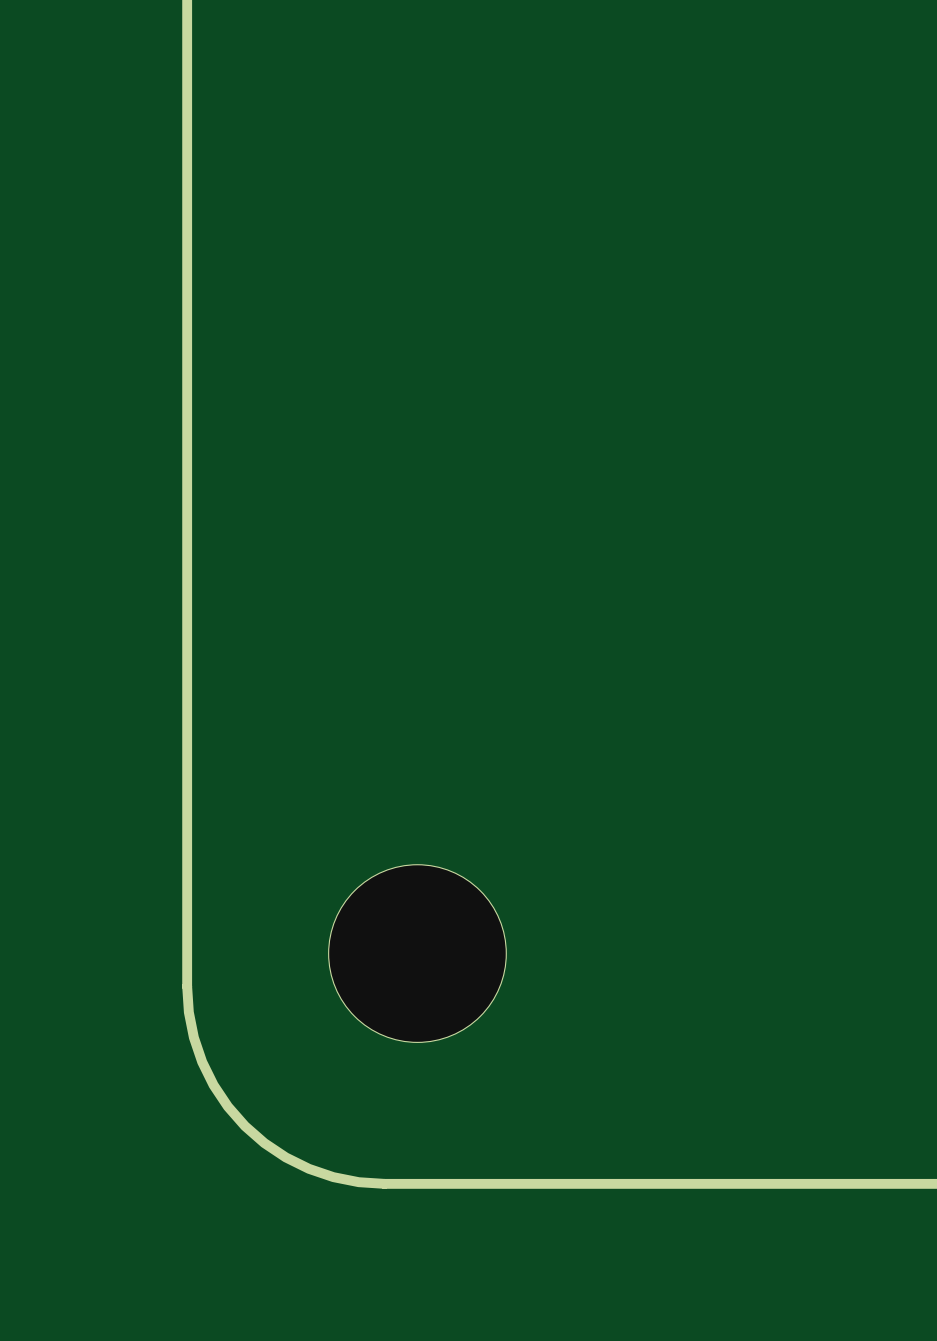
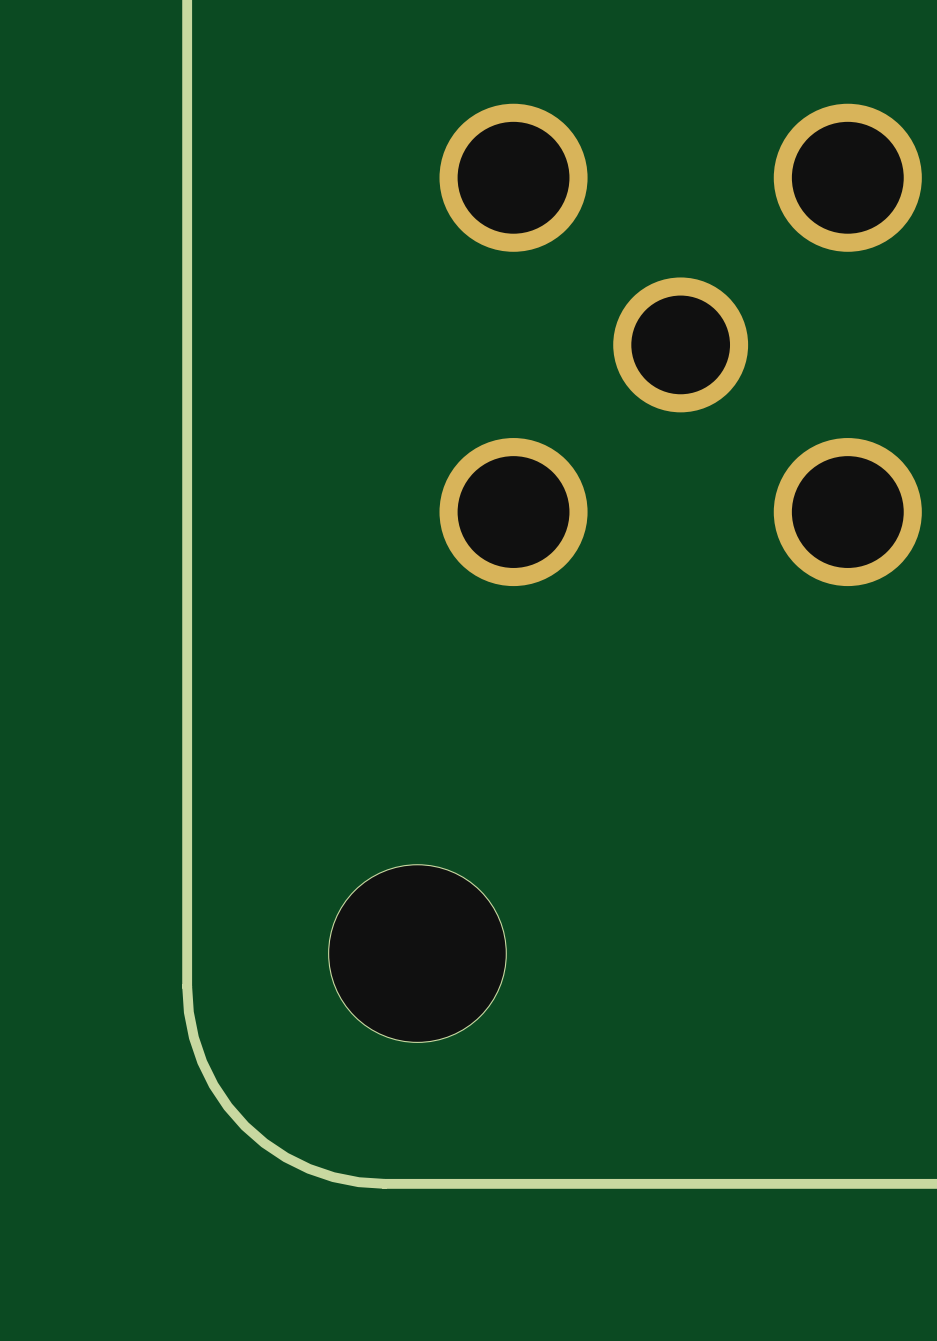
part: none -> (680, 344)

